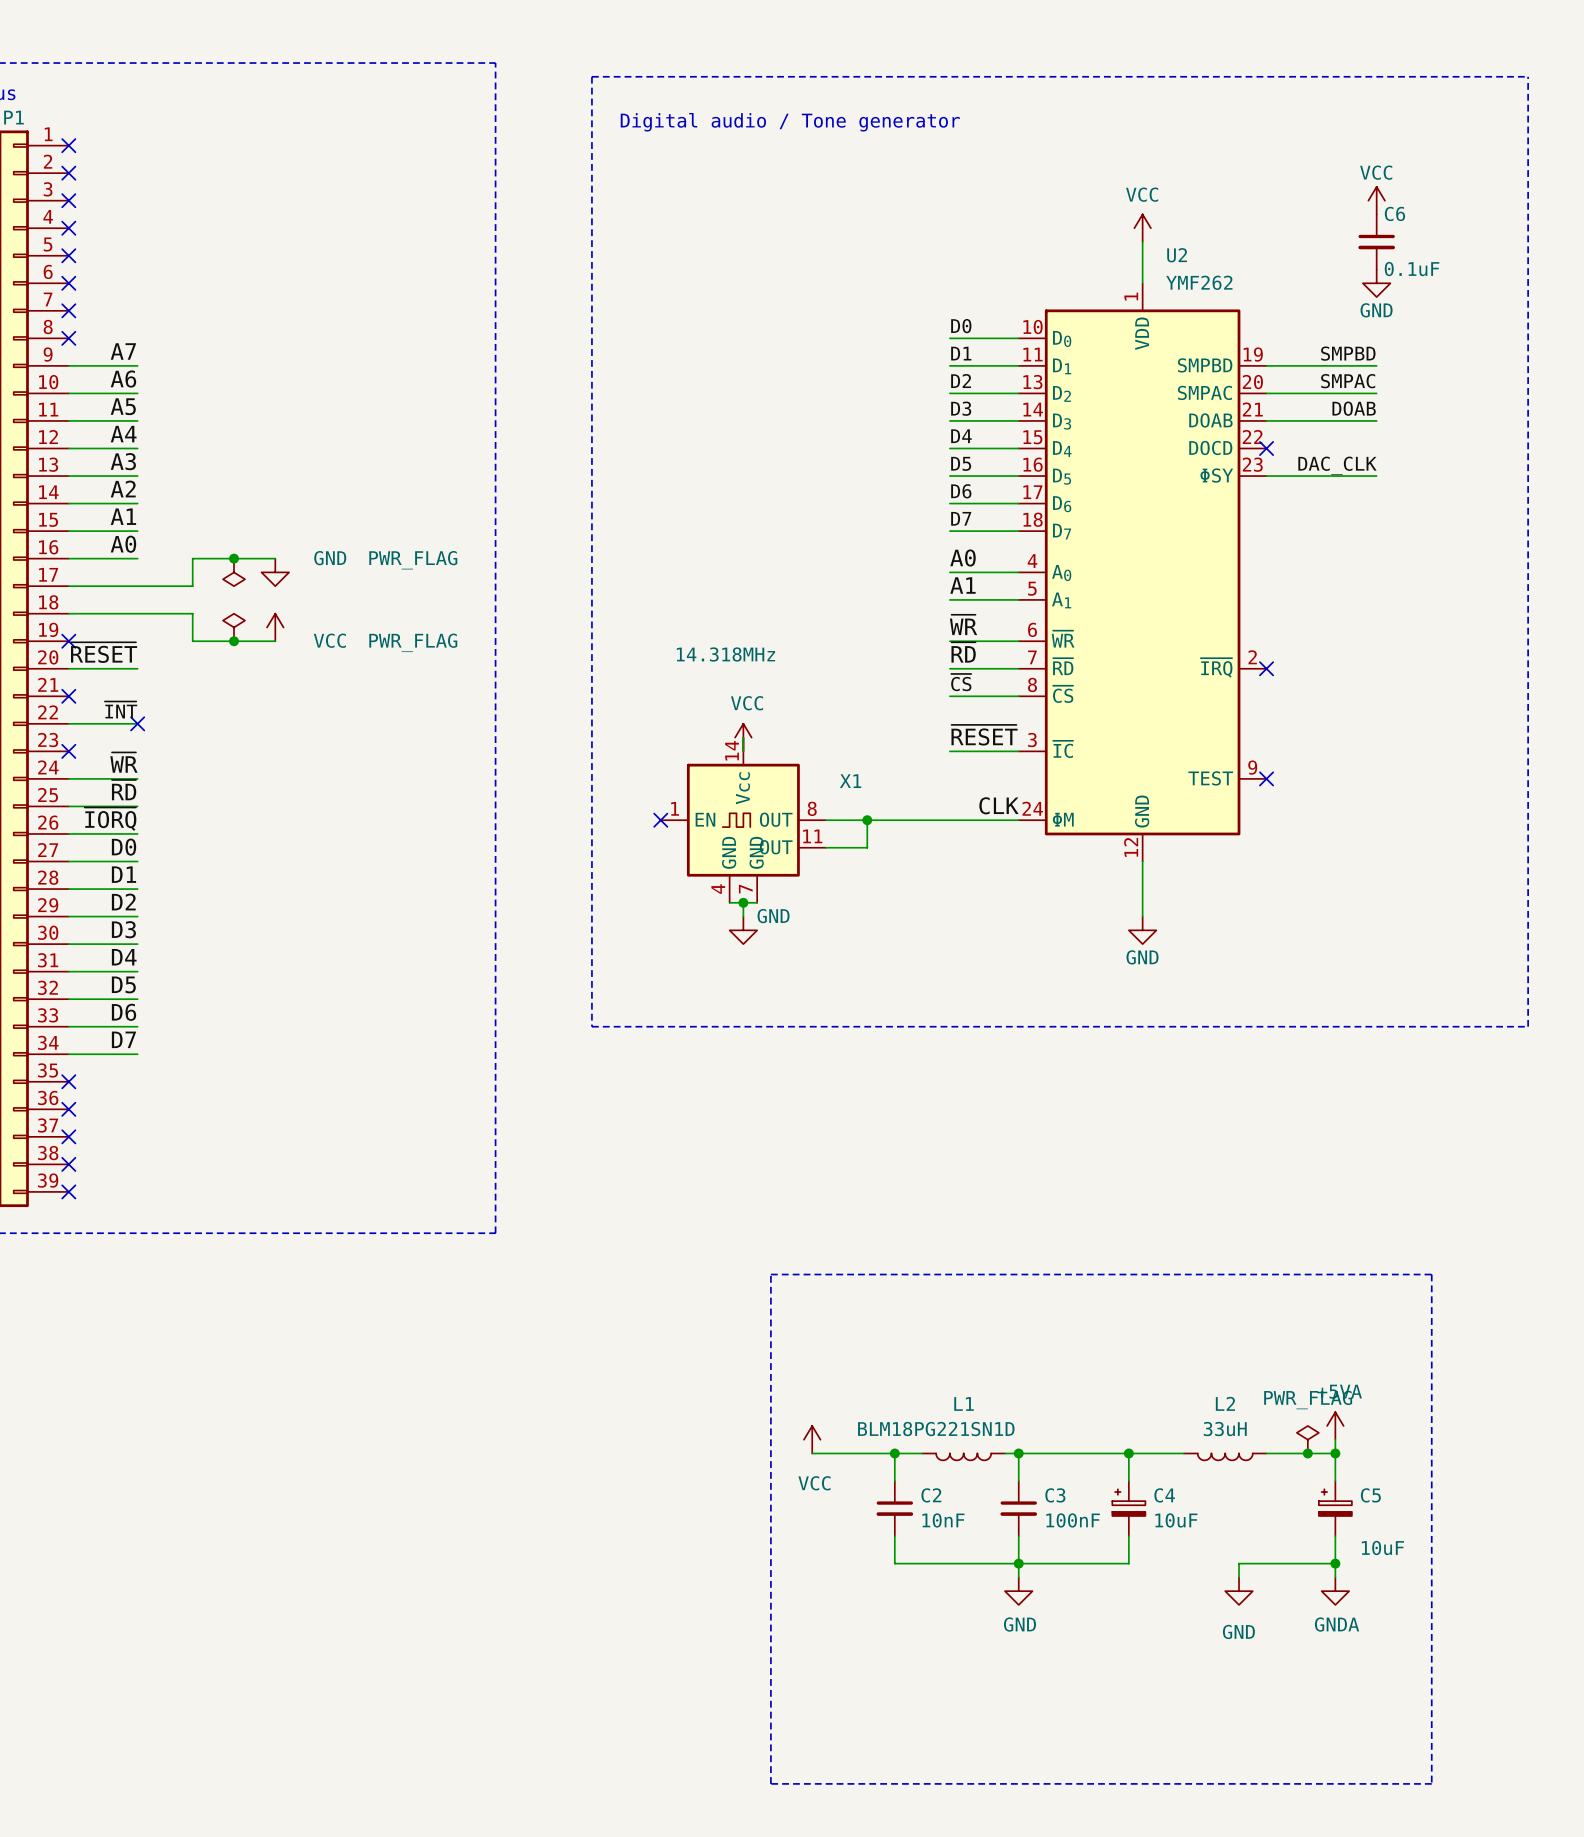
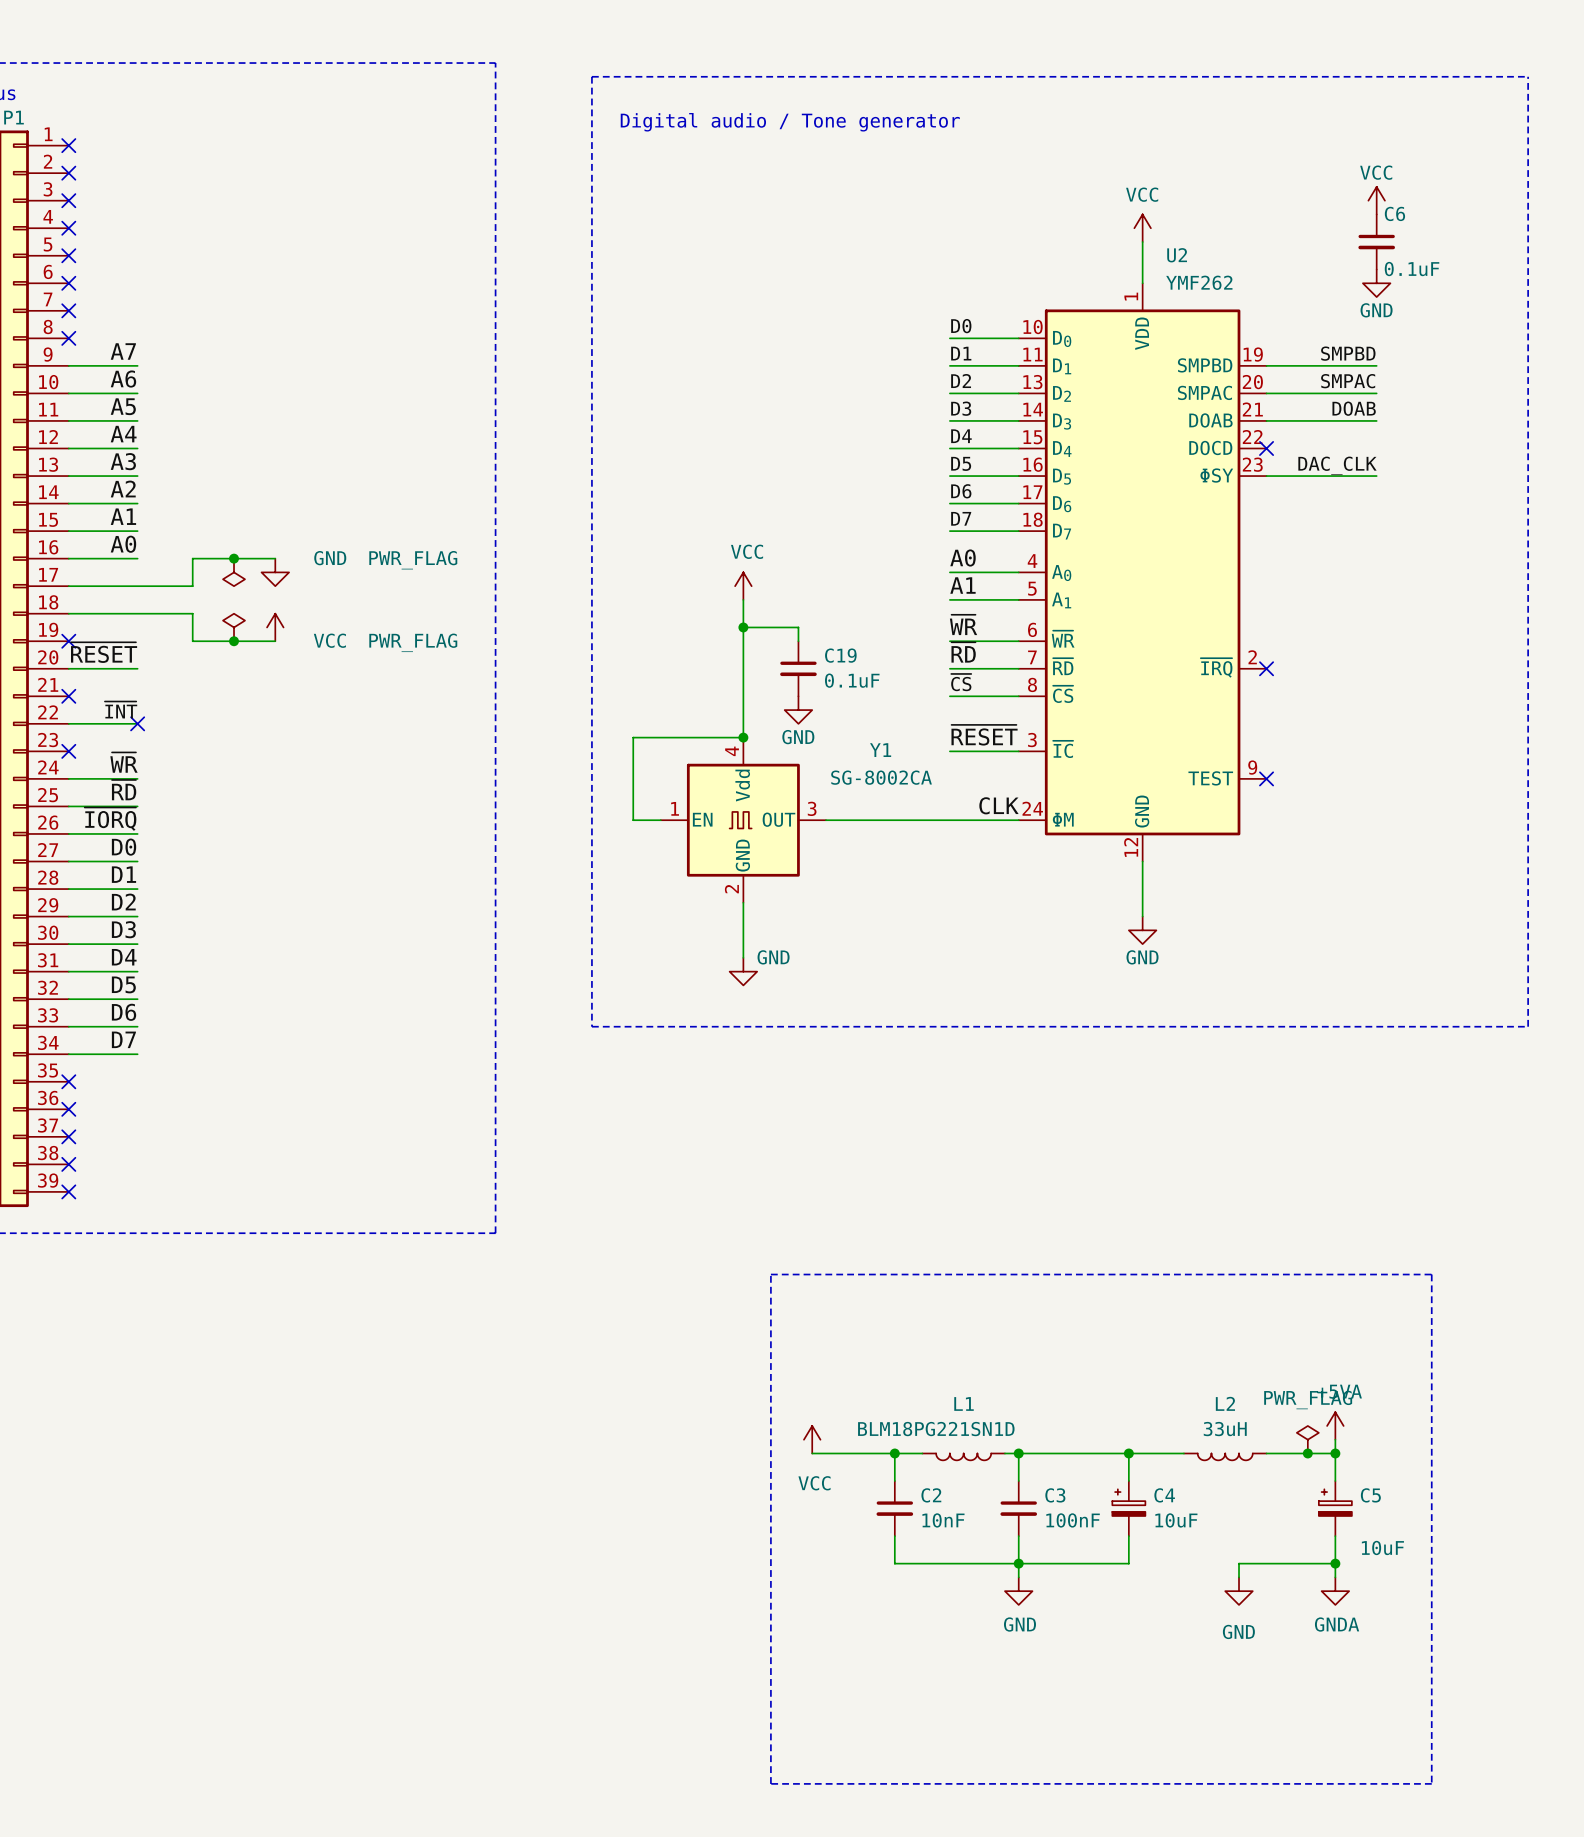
wire: none -> (743, 599) (743, 737) (633, 737) (633, 820) (660, 820)
wire: none -> (743, 627) (798, 627) (798, 641)
junction: none -> (743, 627)
C19: none -> 0.1uF (798, 668)
power symbol: none -> GND (798, 710)
junction: none -> (743, 737)
power symbol position: VCC (743, 737) -> VCC (743, 586)
no-connect mark: (660, 820) -> none
X1: 14.318MHz (743, 820) -> none
Y1: none -> SG-8002CA (743, 820)
wire: (867, 820) (867, 847) (825, 847) -> none
junction: (867, 820) -> none
wire: (729, 902) (757, 902) -> none
junction: (743, 902) -> none
wire: none -> (743, 916) (743, 957)
power symbol position: GND (743, 930) -> GND (743, 971)

